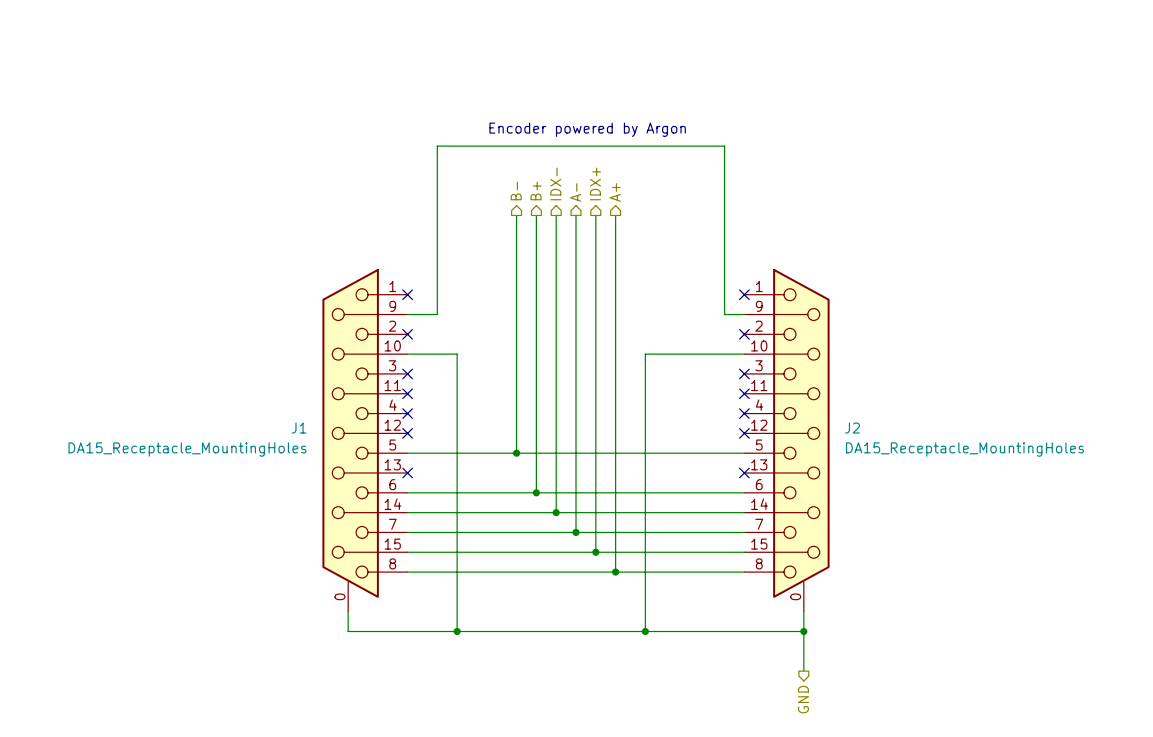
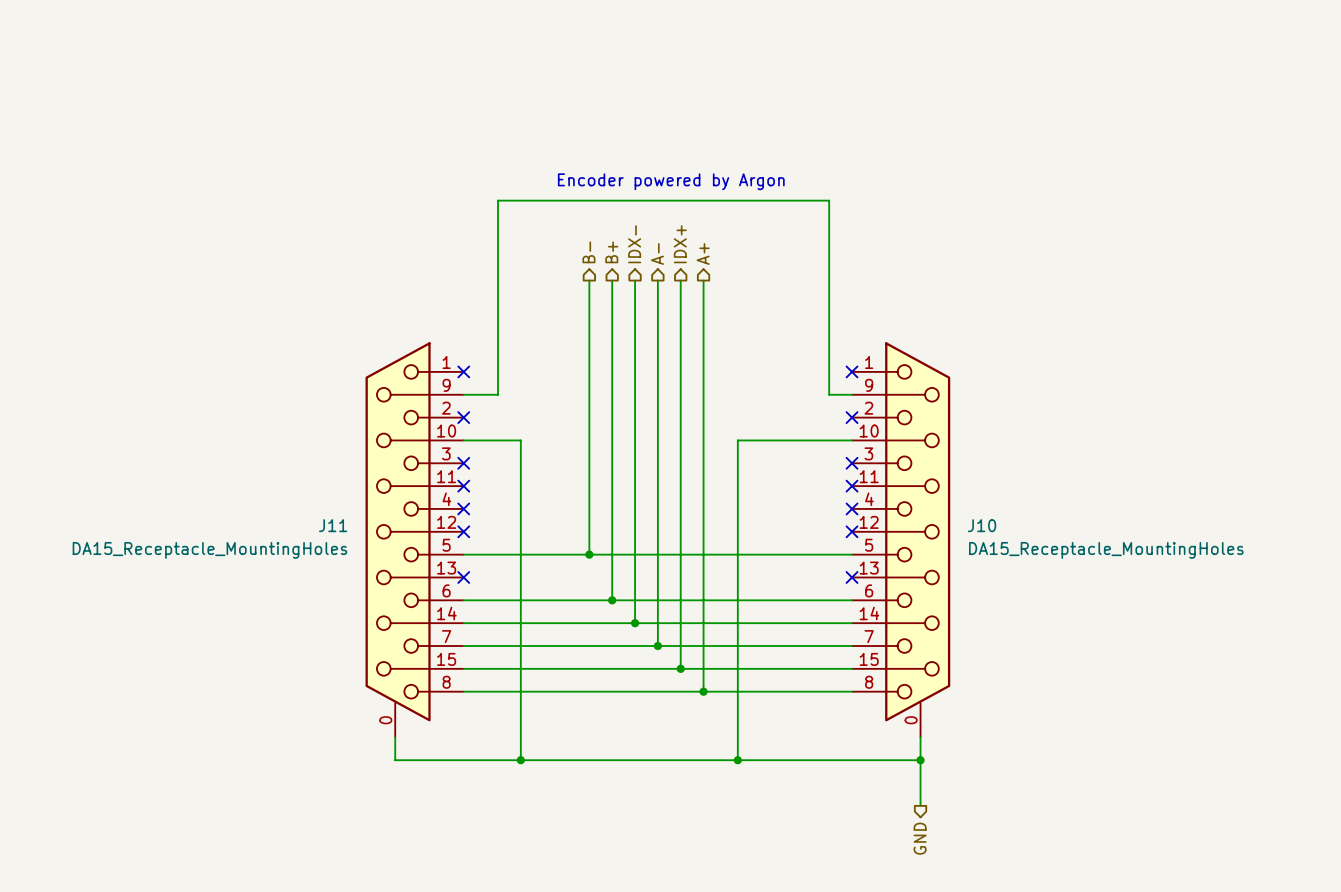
J1 name: J1 (299, 428) -> J11 (333, 525)
J2 name: J2 (852, 428) -> J10 (982, 525)

